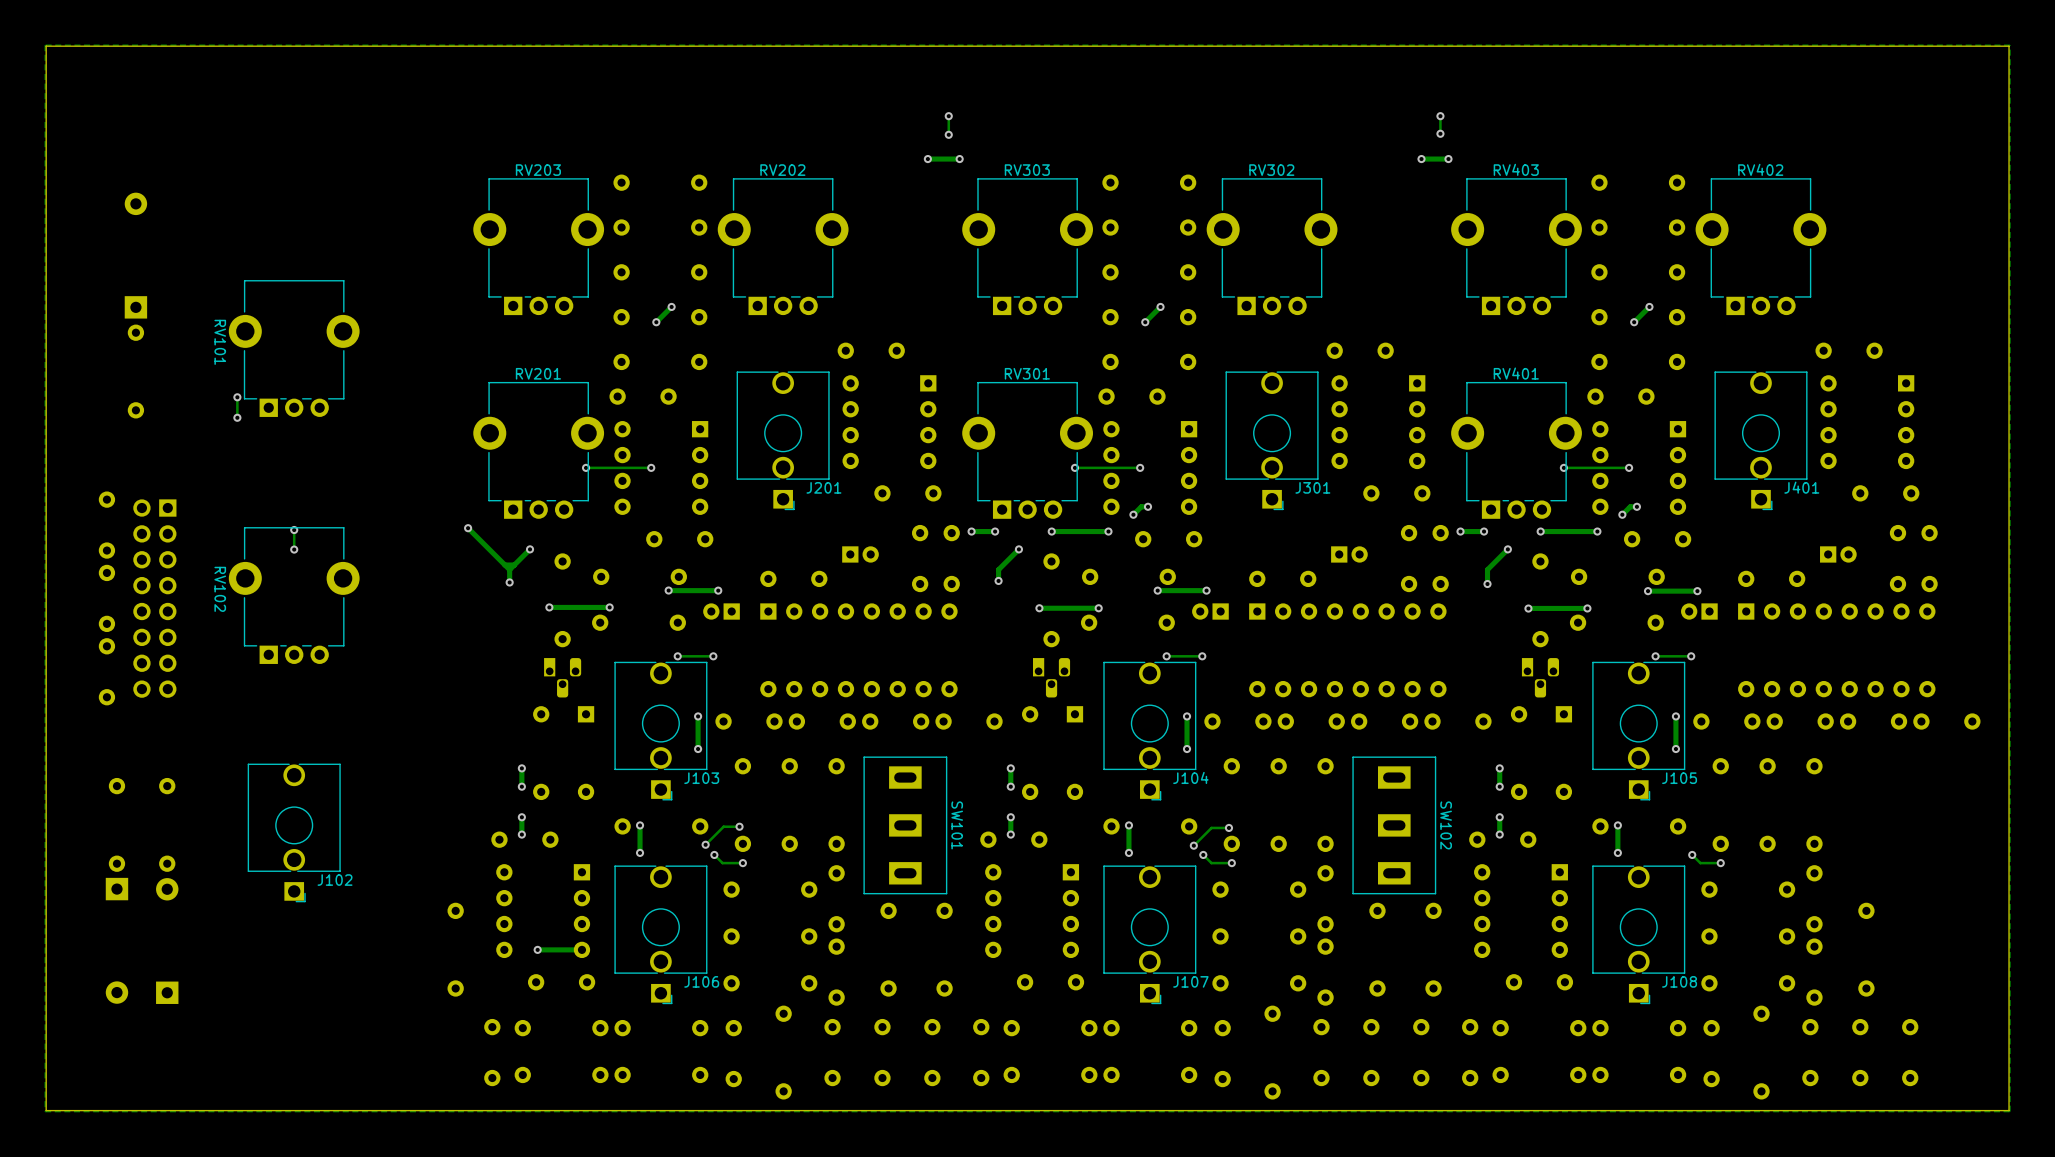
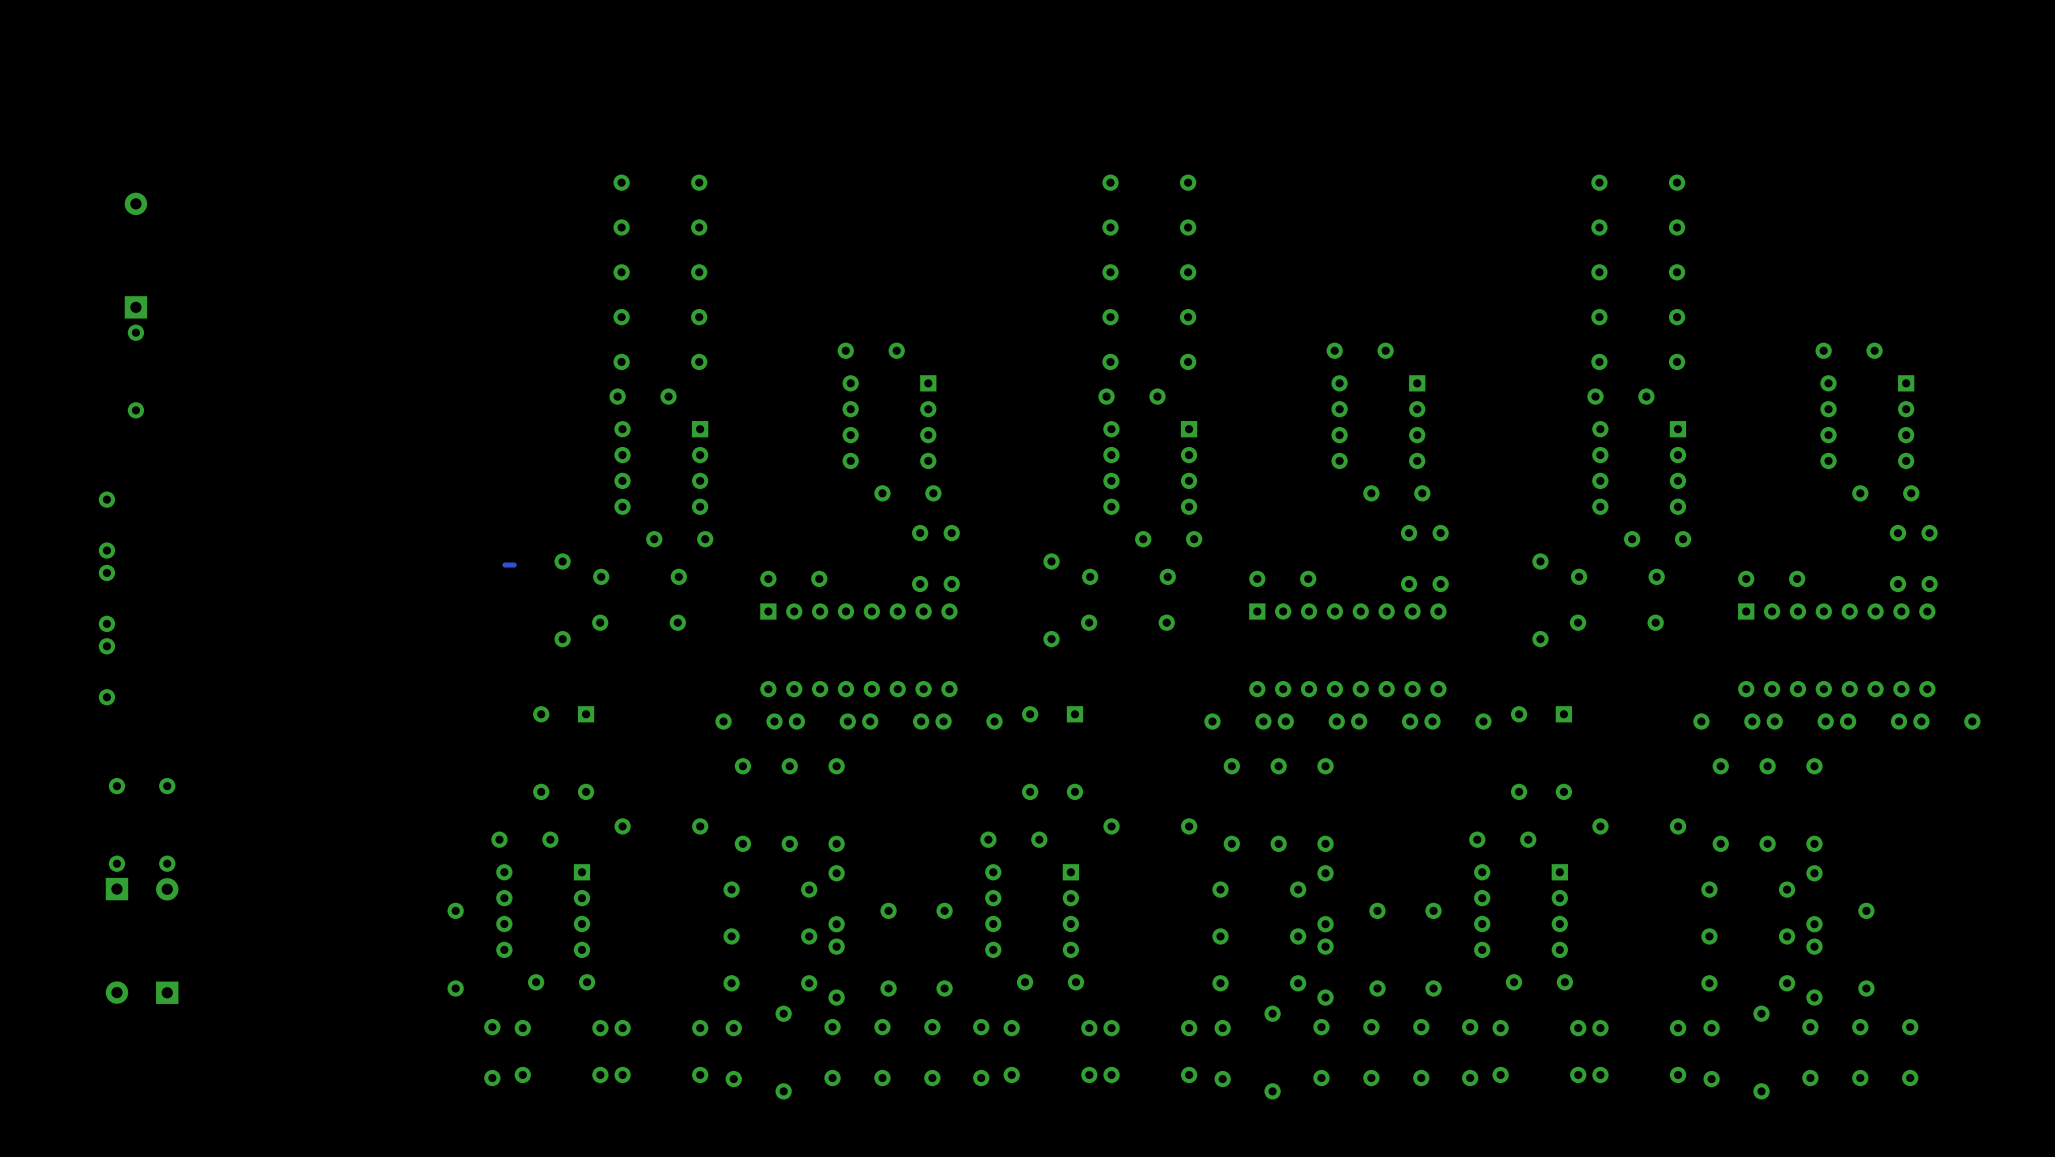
zone outline: (2010, 45) (2010, 1111) (45, 1111) (45, 45) (2010, 45) -> none
board edge: (2009, 46) (46, 46) (46, 1110) (2009, 1110) (2009, 46) -> none
track: (948, 116) (948, 134) -> none
via: (948, 116) -> none
track: (1440, 116) (1440, 133) -> none
via: (1440, 116) -> none
via: (1440, 133) -> none
via: (948, 134) -> none
via: (927, 159) -> none
track: (959, 159) (927, 159) -> none
via: (959, 159) -> none
via: (1421, 159) -> none
track: (1448, 159) (1421, 159) -> none
via: (1448, 159) -> none
RV203: (538, 246) -> none
RV202: (783, 246) -> none
RV303: (1027, 246) -> none
RV302: (1272, 246) -> none
RV403: (1516, 246) -> none
RV402: (1760, 246) -> none
track: (671, 306) (656, 322) -> none
via: (671, 306) -> none
track: (1160, 306) (1145, 322) -> none
via: (1160, 306) -> none
track: (1649, 306) (1634, 322) -> none
via: (1649, 306) -> none
via: (656, 322) -> none
via: (1145, 322) -> none
via: (1634, 322) -> none
RV101: (294, 348) -> none
track: (237, 397) (237, 417) -> none
via: (237, 397) -> none
via: (237, 417) -> none
J201: (783, 440) -> none
J301: (1272, 440) -> none
J401: (1760, 440) -> none
RV201: (538, 450) -> none
RV301: (1027, 450) -> none
RV401: (1516, 450) -> none
via: (586, 467) -> none
track: (651, 467) (586, 467) -> none
via: (651, 467) -> none
via: (1074, 467) -> none
track: (1140, 467) (1074, 467) -> none
via: (1140, 467) -> none
via: (1563, 467) -> none
track: (1629, 467) (1563, 467) -> none
via: (1629, 467) -> none
track: (1148, 506) (1141, 506) (1133, 514) -> none
via: (1148, 506) -> none
track: (1636, 506) (1630, 506) (1622, 514) -> none
via: (1636, 506) -> none
via: (1133, 514) -> none
via: (1622, 514) -> none
track: (468, 528) (509, 569) -> none
via: (468, 528) -> none
track: (294, 530) (294, 549) -> none
via: (294, 530) -> none
via: (971, 531) -> none
track: (995, 531) (971, 531) -> none
via: (995, 531) -> none
via: (1051, 531) -> none
track: (1108, 531) (1051, 531) -> none
via: (1108, 531) -> none
via: (1460, 531) -> none
track: (1484, 531) (1460, 531) -> none
via: (1484, 531) -> none
via: (1540, 531) -> none
track: (1597, 531) (1540, 531) -> none
via: (1597, 531) -> none
via: (294, 549) -> none
track: (530, 549) (509, 569) -> none
via: (530, 549) -> none
track: (1018, 549) (998, 569) (998, 580) -> none
via: (1018, 549) -> none
track: (1507, 549) (1487, 569) (1487, 584) -> none
via: (1507, 549) -> none
part: (860, 554) -> none
part: (1349, 554) -> none
part: (1838, 554) -> none
track: (509, 569) (509, 582) -> none
via: (998, 580) -> none
via: (509, 582) -> none
via: (1487, 584) -> none
via: (668, 590) -> none
track: (718, 590) (668, 590) -> none
via: (718, 590) -> none
via: (1157, 590) -> none
track: (1206, 590) (1157, 590) -> none
via: (1206, 590) -> none
via: (1648, 591) -> none
track: (1697, 591) (1648, 591) -> none
via: (1697, 591) -> none
RV102: (294, 595) -> none
part: (154, 598) -> none
via: (549, 607) -> none
track: (609, 607) (549, 607) -> none
via: (609, 607) -> none
via: (1039, 608) -> none
track: (1098, 608) (1039, 608) -> none
via: (1098, 608) -> none
via: (1528, 608) -> none
track: (1587, 608) (1528, 608) -> none
via: (1587, 608) -> none
part: (721, 611) -> none
part: (1210, 611) -> none
part: (1699, 611) -> none
via: (677, 656) -> none
track: (713, 656) (677, 656) -> none
via: (713, 656) -> none
via: (1166, 656) -> none
track: (1202, 656) (1166, 656) -> none
via: (1202, 656) -> none
via: (1655, 656) -> none
track: (1691, 656) (1655, 656) -> none
via: (1691, 656) -> none
part: (562, 677) -> none
part: (1051, 677) -> none
part: (1540, 677) -> none
track: (698, 716) (698, 749) -> none
via: (698, 716) -> none
track: (1187, 716) (1187, 749) -> none
via: (1187, 716) -> none
track: (1675, 716) (1675, 749) -> none
via: (1675, 716) -> none
J103: (660, 731) -> none
J104: (1149, 731) -> none
J105: (1638, 731) -> none
via: (698, 749) -> none
via: (1187, 749) -> none
via: (1675, 749) -> none
track: (521, 768) (521, 786) -> none
via: (521, 768) -> none
track: (1010, 768) (1010, 786) -> none
via: (1010, 768) -> none
track: (1499, 768) (1499, 786) -> none
via: (1499, 768) -> none
via: (521, 786) -> none
via: (1010, 786) -> none
via: (1499, 786) -> none
track: (521, 817) (521, 834) -> none
via: (521, 817) -> none
track: (1010, 817) (1010, 834) -> none
via: (1010, 817) -> none
track: (1499, 817) (1499, 834) -> none
via: (1499, 817) -> none
track: (640, 825) (640, 852) -> none
via: (640, 825) -> none
SW101: (905, 825) -> none
track: (1128, 825) (1128, 852) -> none
via: (1128, 825) -> none
SW102: (1394, 825) -> none
track: (1617, 825) (1617, 852) -> none
via: (1617, 825) -> none
track: (739, 826) (723, 826) (705, 844) -> none
via: (739, 826) -> none
track: (1228, 827) (1211, 827) (1193, 845) -> none
via: (1228, 827) -> none
J102: (294, 832) -> none
via: (521, 834) -> none
via: (1010, 834) -> none
via: (1499, 834) -> none
via: (705, 844) -> none
via: (1193, 845) -> none
via: (640, 852) -> none
via: (1128, 852) -> none
via: (1617, 852) -> none
track: (714, 854) (722, 863) (742, 863) -> none
via: (714, 854) -> none
track: (1203, 854) (1211, 863) (1231, 863) -> none
via: (1203, 854) -> none
track: (1692, 854) (1700, 863) (1720, 863) -> none
via: (1692, 854) -> none
via: (742, 863) -> none
via: (1231, 863) -> none
via: (1720, 863) -> none
J106: (660, 934) -> none
J107: (1149, 934) -> none
J108: (1638, 934) -> none
via: (537, 949) -> none
track: (581, 949) (537, 949) -> none

